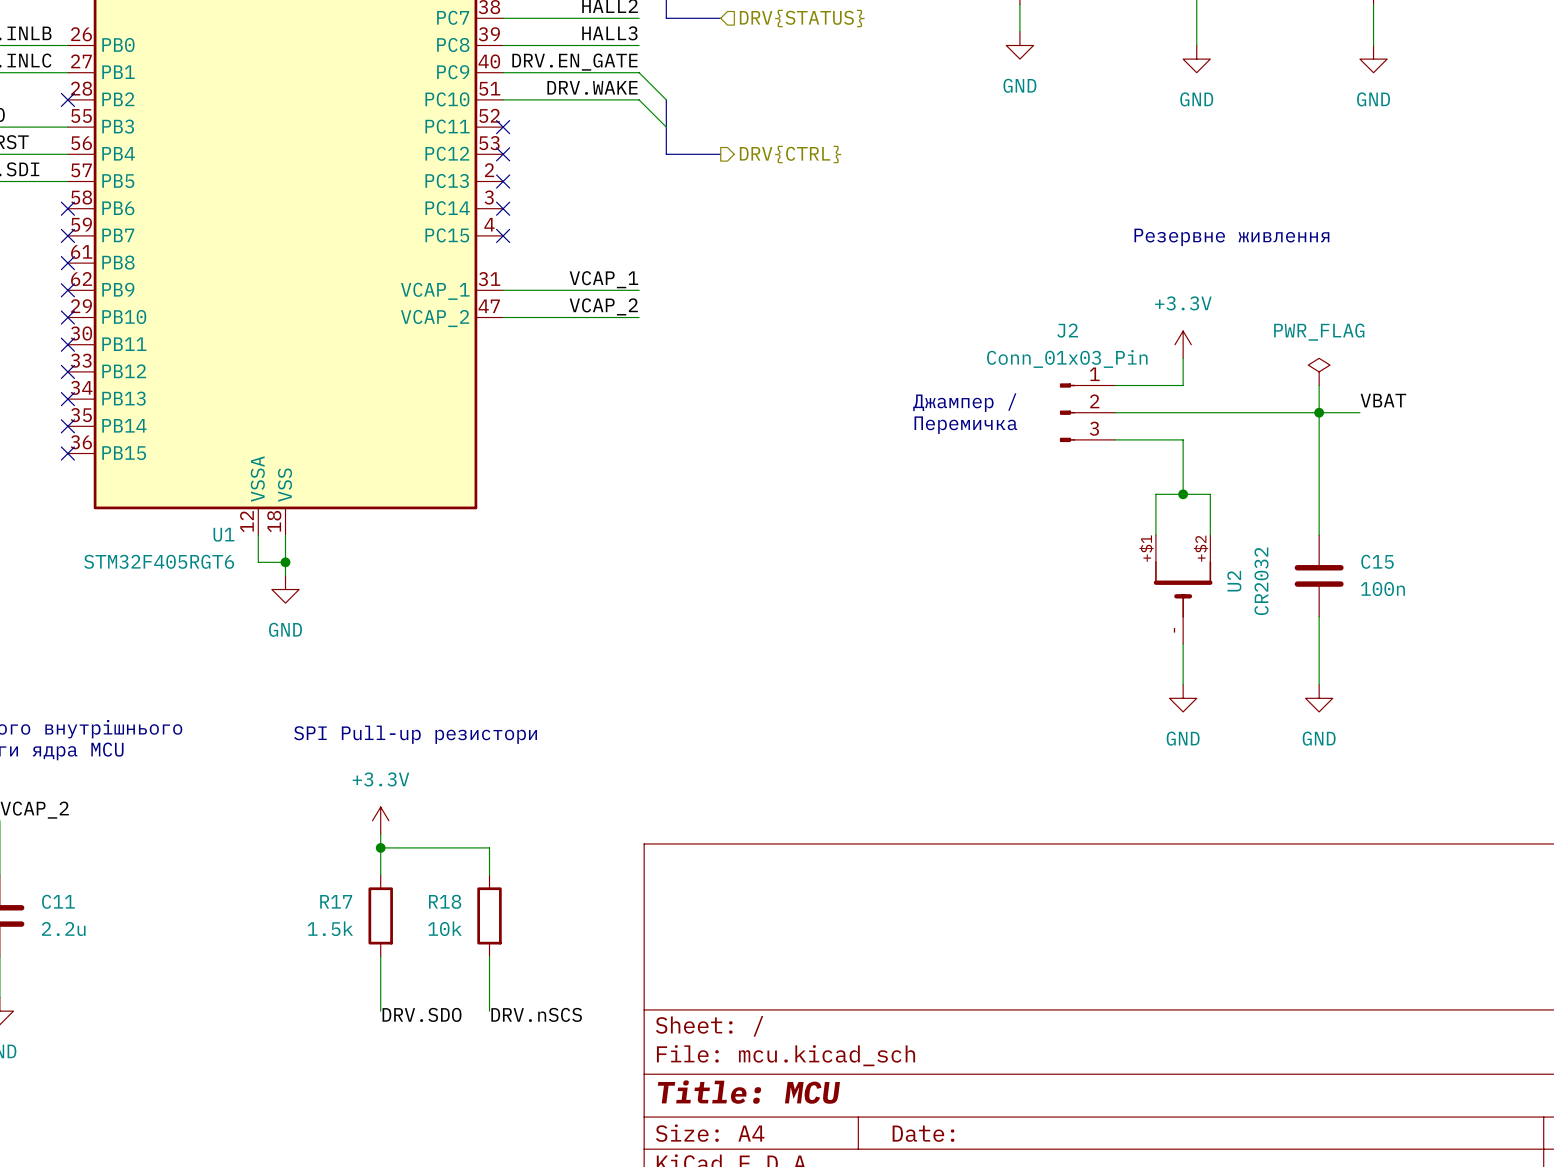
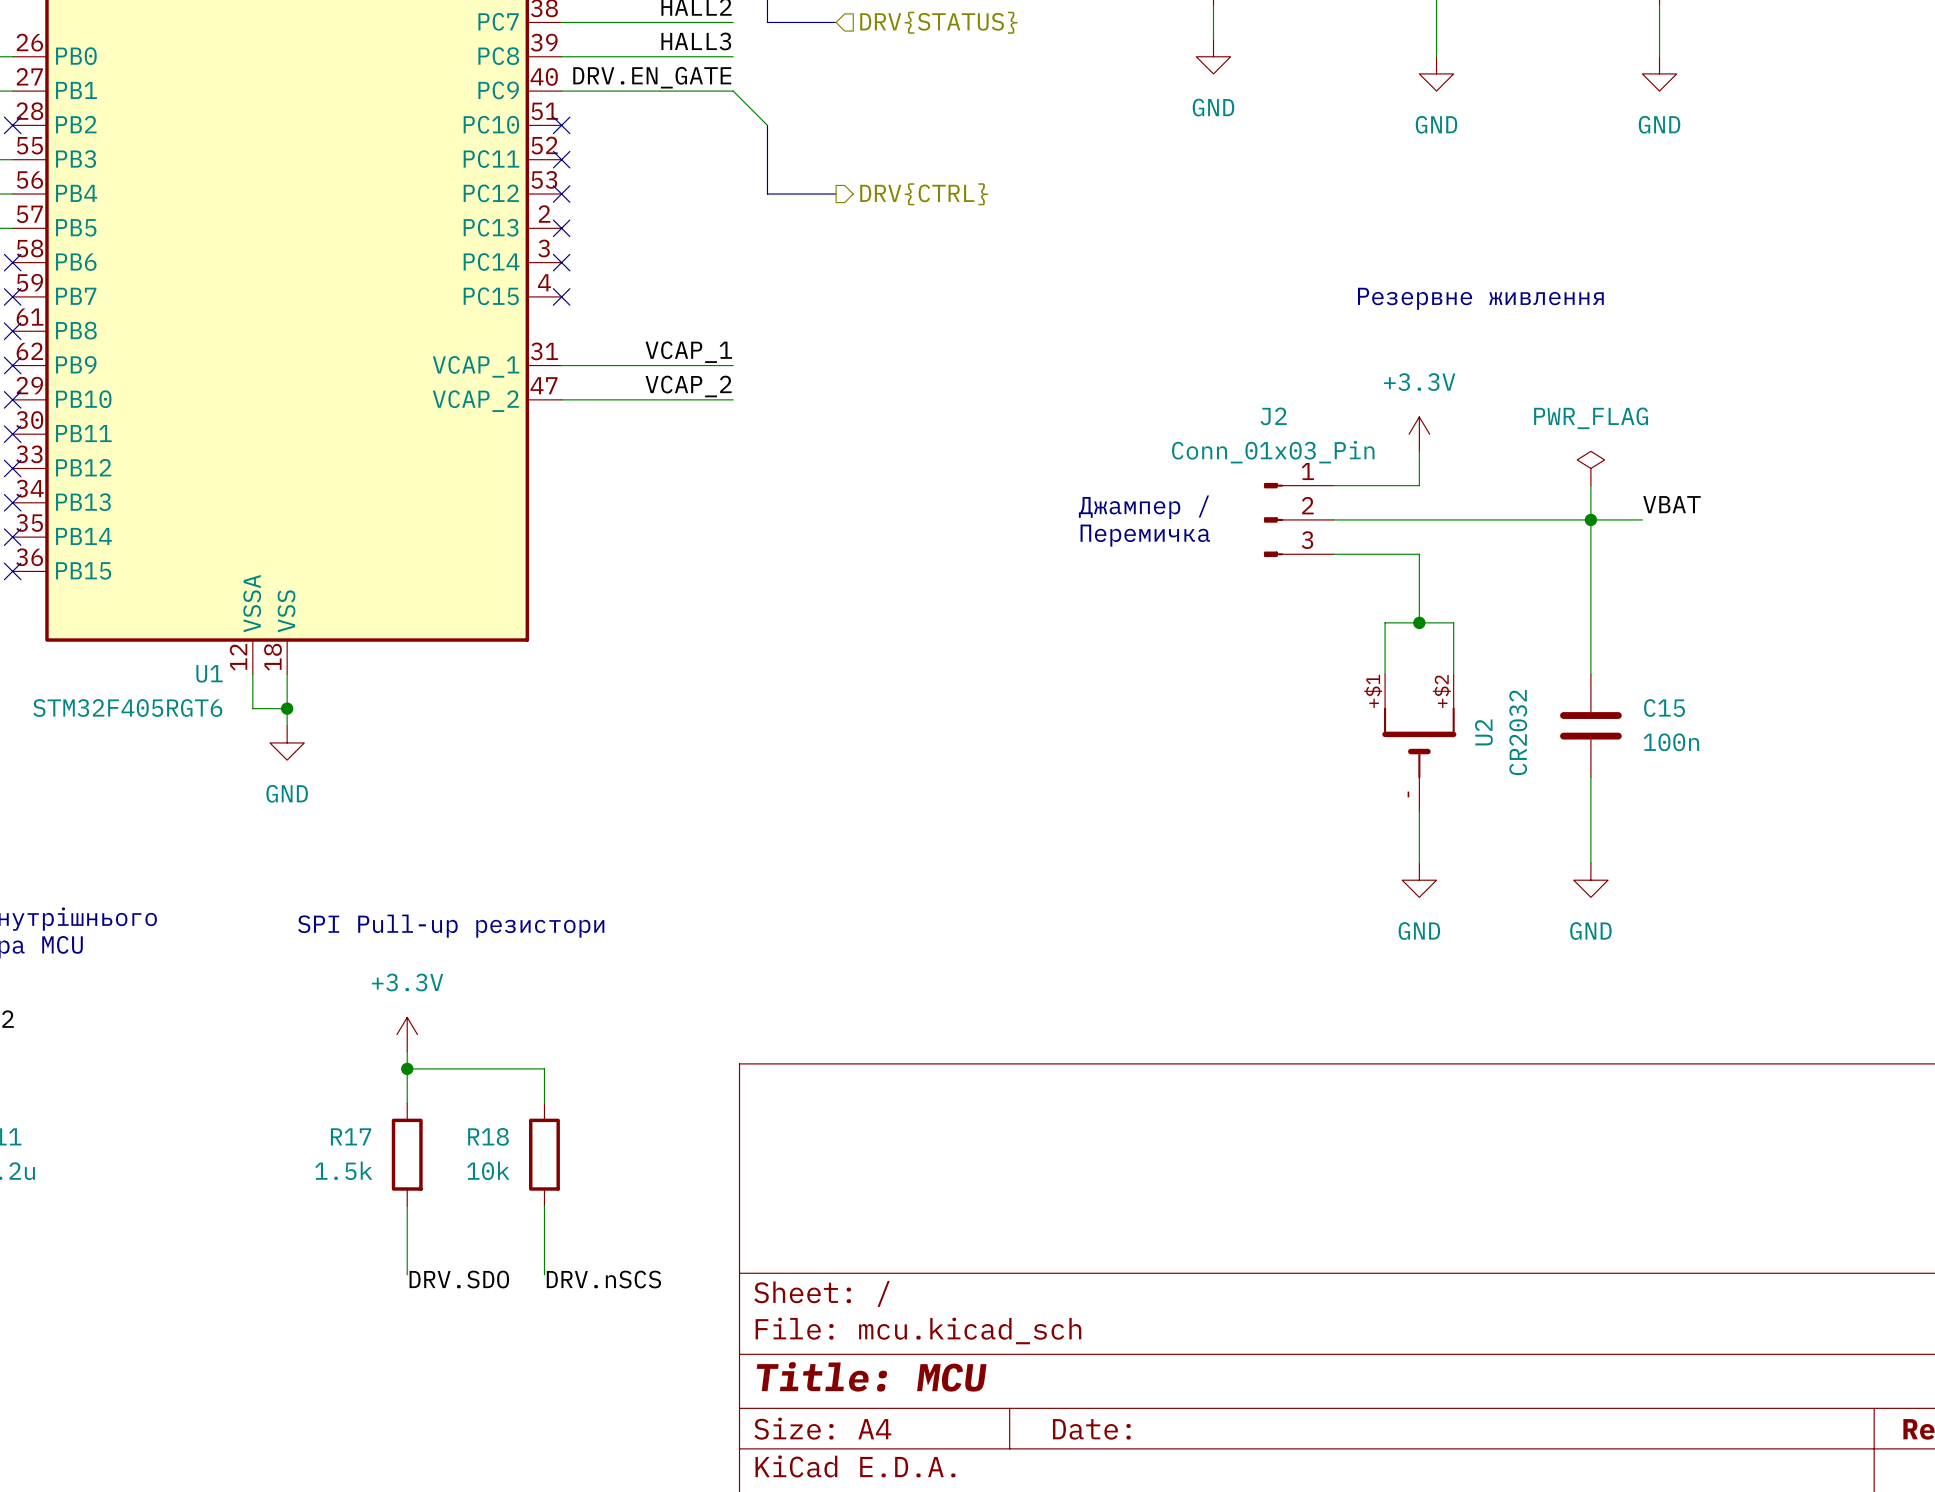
label: DRV.WAKE (592, 87) -> none
wire: (503, 99) (639, 99) (666, 127) -> none
no-connect mark: none -> (561, 125)

